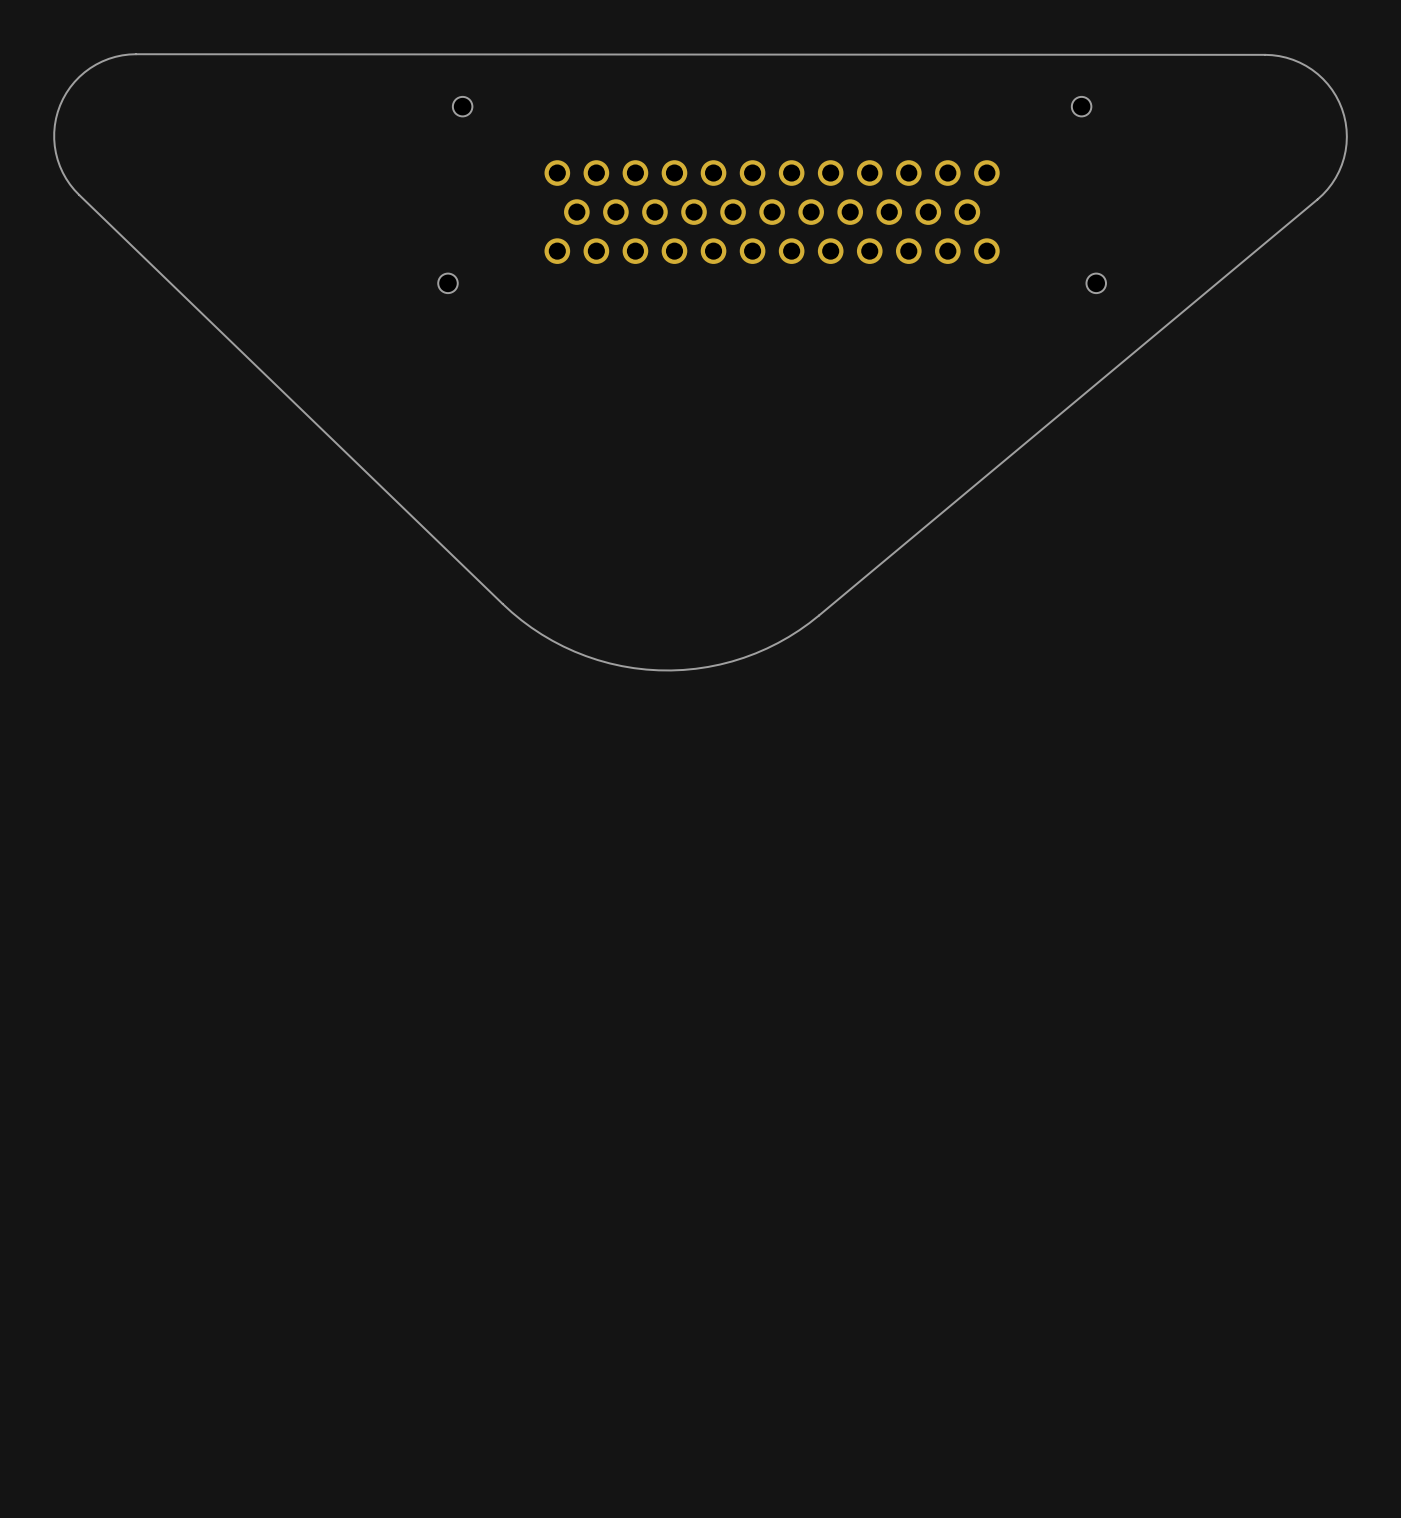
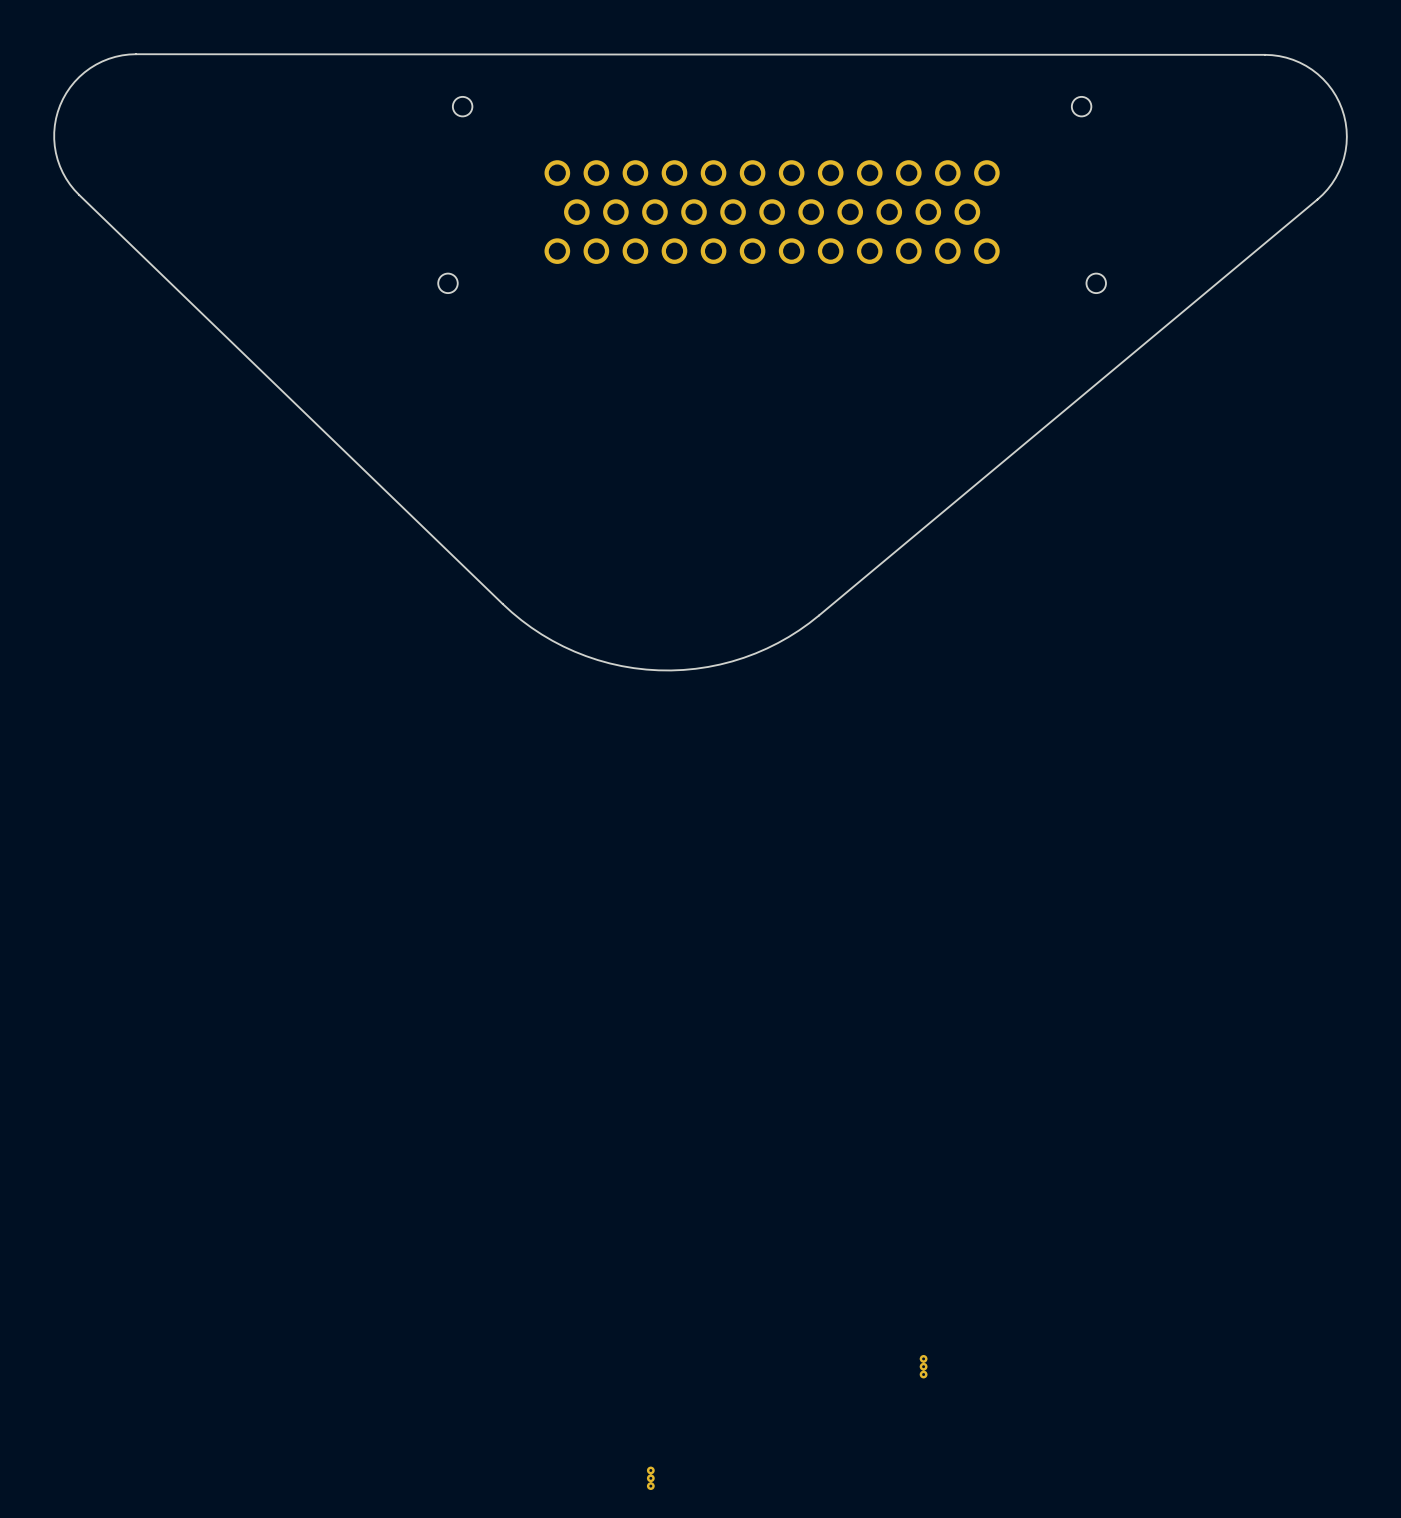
part: none -> (923, 1366)
part: none -> (650, 1478)

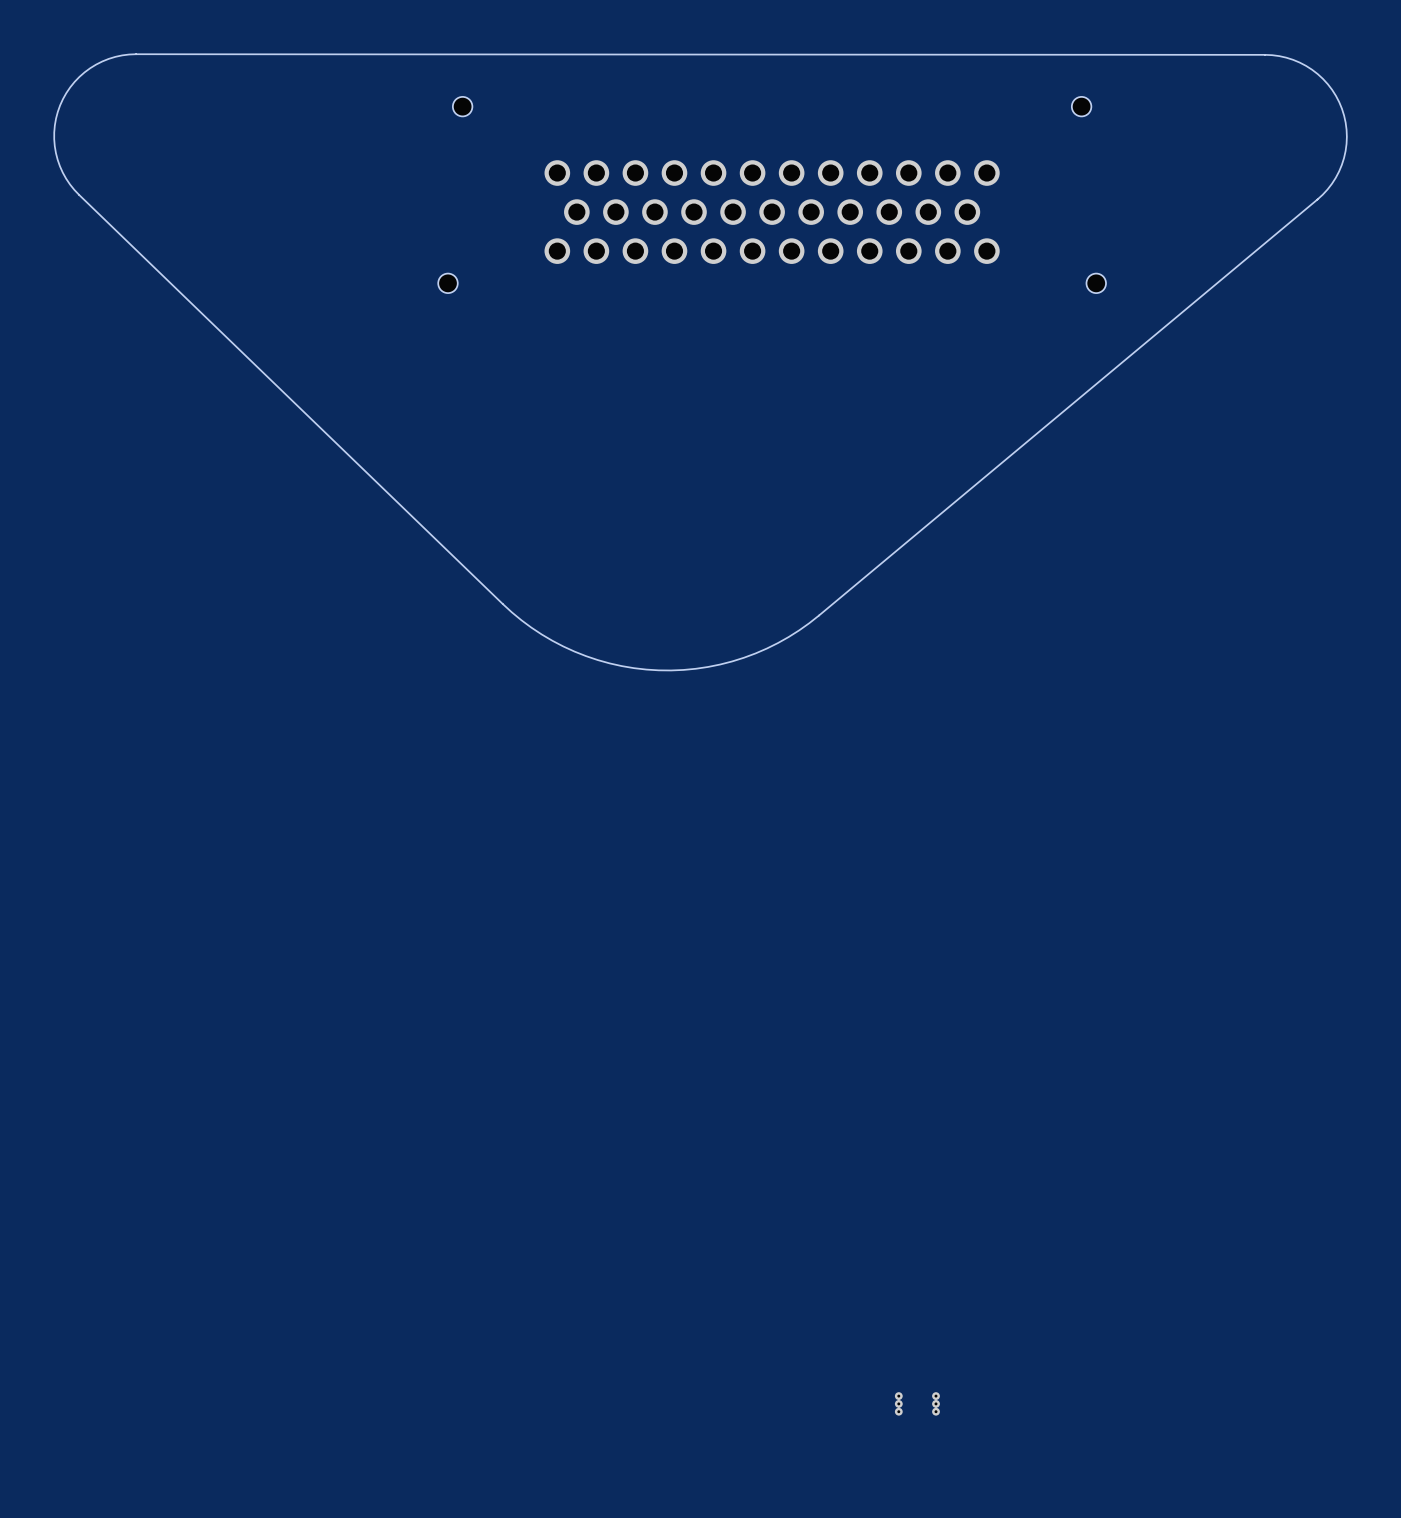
part: (923, 1366) -> none
part: none -> (898, 1403)
part: none -> (936, 1403)
part: (650, 1478) -> none

